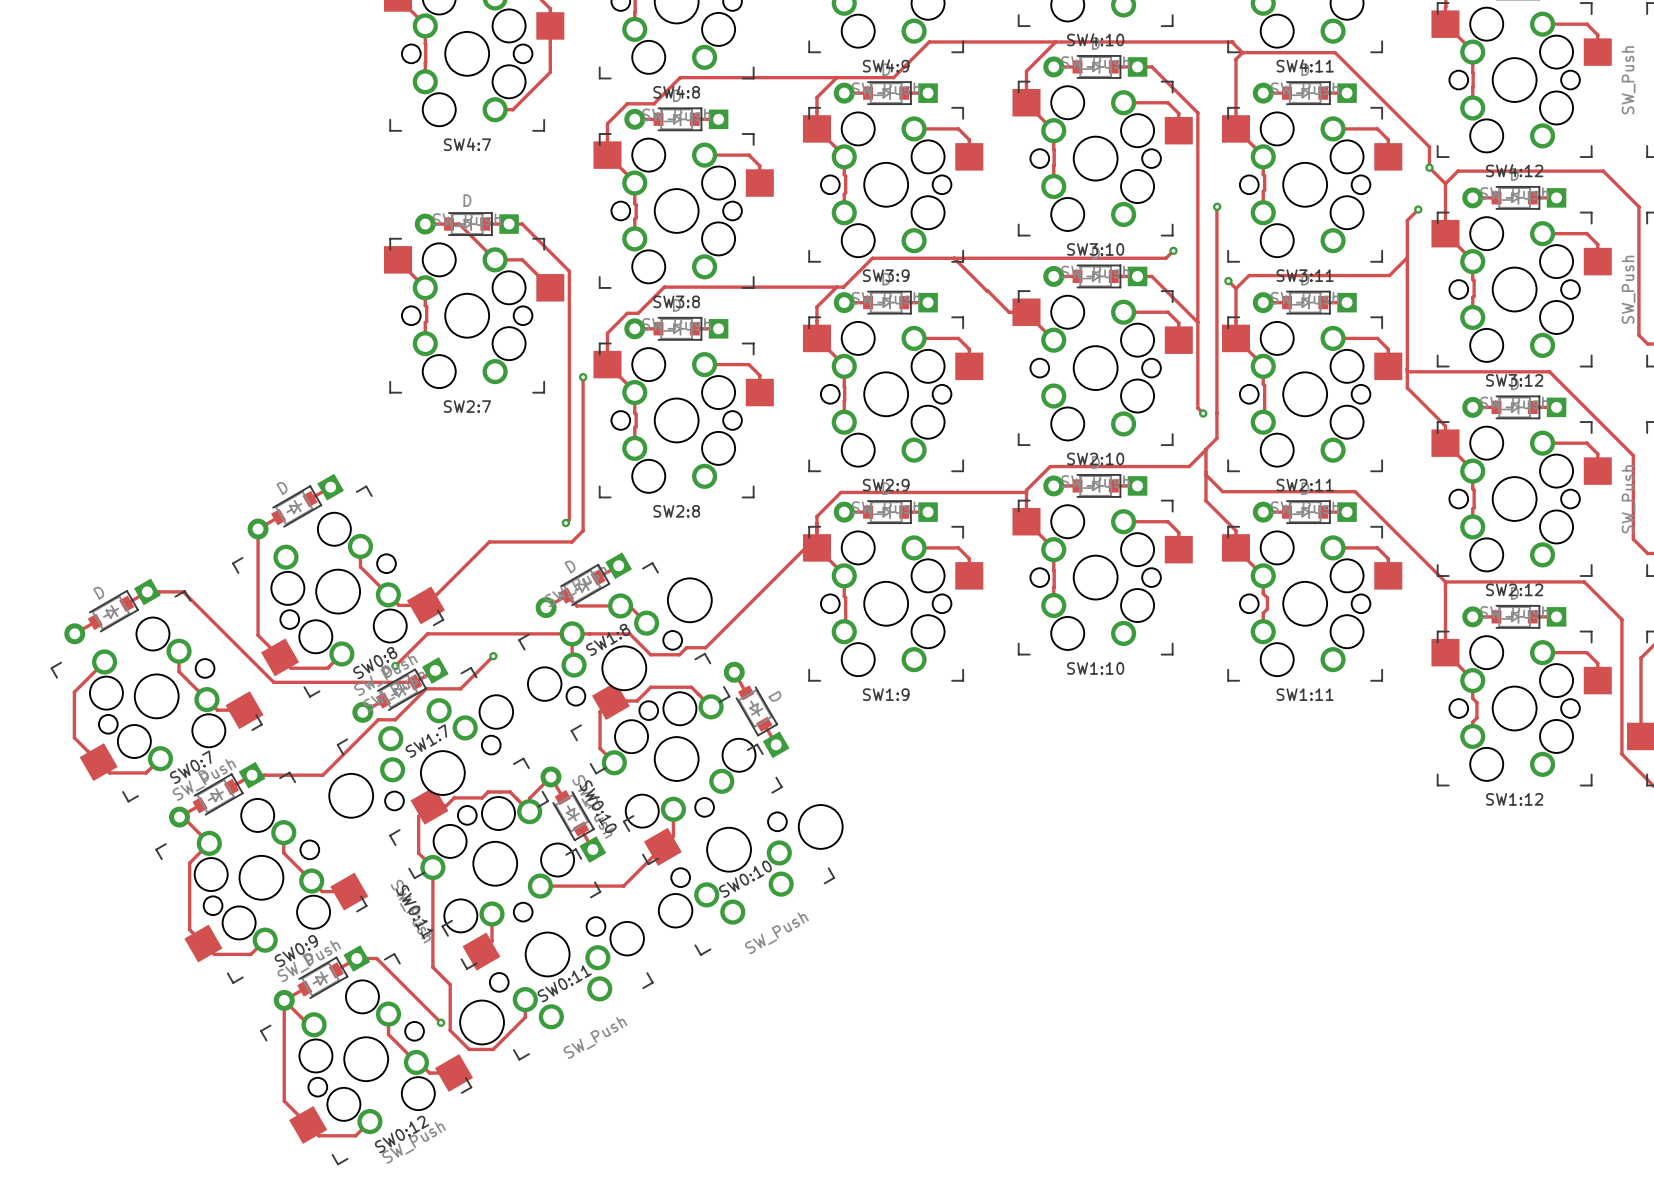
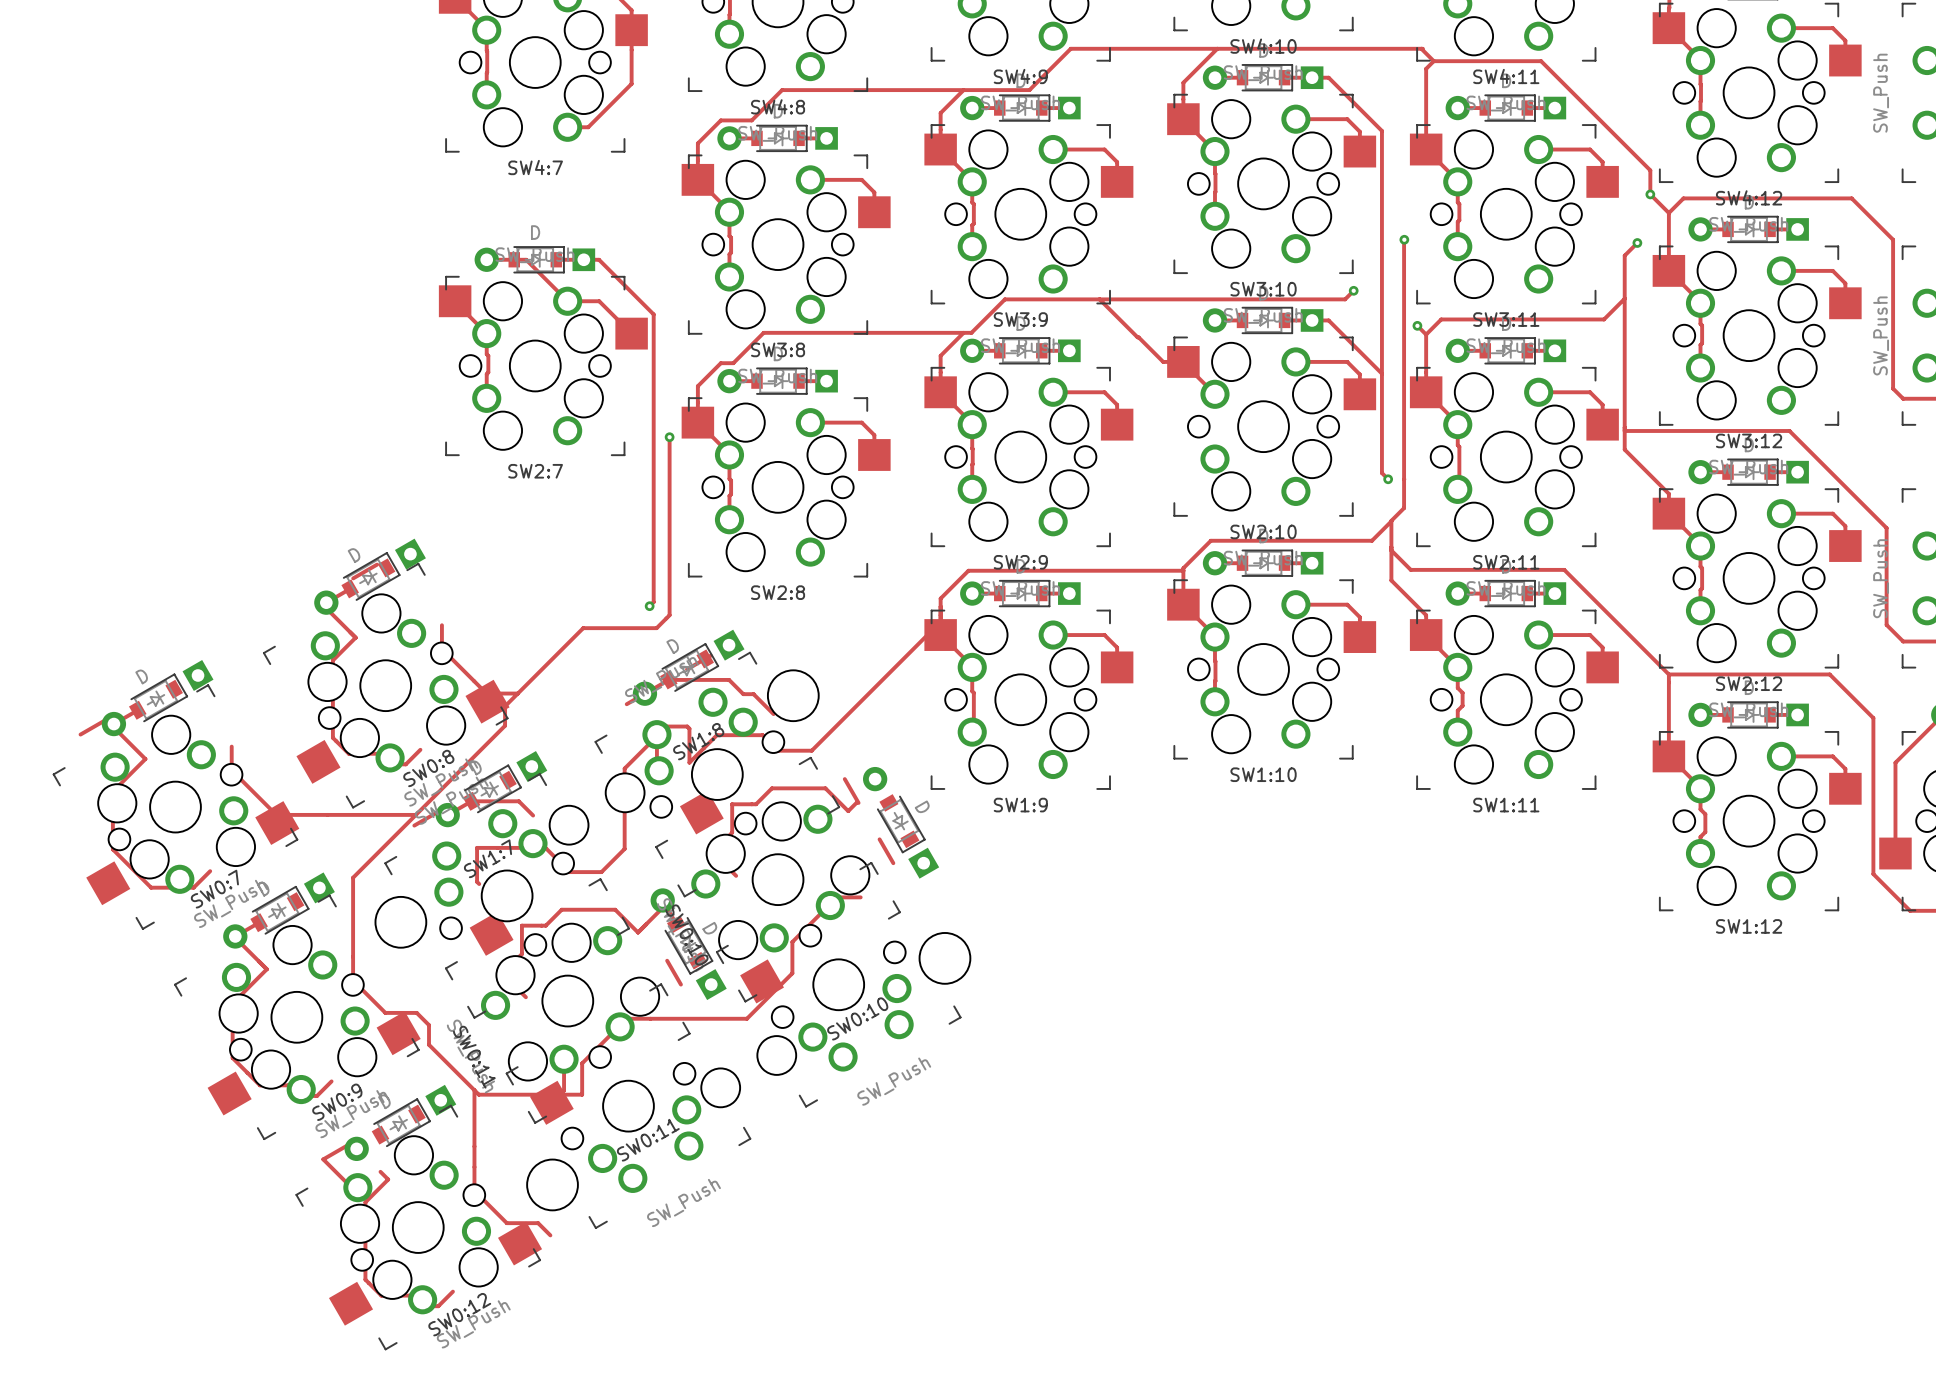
part position: (295, 506) -> (370, 576)
track: none -> (350, 588) (326, 602) (326, 608) (355, 637) (332, 660) (332, 737) (348, 753) (377, 753) (387, 764) (405, 764) (420, 749)
track: (278, 517) (258, 529) (258, 635) (290, 668) (327, 668) (341, 653) -> none
track: (508, 541) (489, 541) (425, 605) (398, 605) (360, 566) (360, 546) -> (583, 628) (505, 706) (505, 725) (353, 877) (353, 980) (385, 1012) (416, 1012) (429, 1025) (429, 1044) (478, 1094) (582, 1094) (582, 1063) (626, 1018) (746, 1018) (792, 973) (792, 941) (836, 897) (860, 897)
part position: (583, 585) -> (688, 667)
track: (566, 595) (576, 605) (629, 605) (646, 623) -> (650, 690) (668, 679) (729, 679) (743, 694) (753, 694) (773, 714)
track: (126, 603) (147, 591) (183, 591) (273, 682) (414, 682) (435, 670) -> none
part position: (112, 611) -> (157, 698)
track: none -> (137, 710) (113, 724) (113, 727) (145, 759) (112, 791) (112, 849) (151, 887) (193, 887) (210, 871)
track: none -> (231, 746) (231, 770) (276, 814) (415, 814)
track: (686, 647) (679, 654) (650, 654) (629, 633) (427, 633) (395, 665) -> (789, 750) (778, 750) (762, 735) (716, 735) (689, 762) (689, 728) (687, 726) (666, 726) (624, 768) (624, 848) (601, 872) (569, 872) (545, 847) (477, 847) (477, 881) (479, 884)
track: (179, 651) (179, 671) (217, 710) (244, 710) -> (441, 625) (441, 648) (486, 693) (517, 693)
track: (493, 656) (460, 688) (426, 688) (395, 719) (378, 719) (322, 775) (252, 775) (231, 787) -> none
via: (493, 656) -> none
track: (104, 661) (74, 692) (74, 737) (109, 772) (146, 772) (160, 758) -> none
via: (395, 665) -> none
part position: (400, 689) -> (491, 789)
track: none -> (856, 802) (848, 811) (825, 788) (771, 788) (756, 804) (732, 804) (732, 832) (721, 843) (721, 861) (736, 875)
track: none -> (447, 815) (471, 801) (518, 801) (533, 815)
track: (711, 706) (691, 687) (650, 687) (637, 700) (610, 700) (600, 711) (600, 748) (614, 762) -> none
part position: (756, 709) -> (901, 822)
part position: (217, 794) -> (279, 910)
track: none -> (259, 922) (235, 936) (266, 969) (232, 1003) (232, 1058) (259, 1085) (288, 1085) (298, 1095) (317, 1095) (331, 1081)
track: (562, 797) (550, 776) (529, 798) (529, 811) (510, 791) (488, 791) (482, 797) (454, 797) (446, 805) (429, 805) (418, 816) (418, 853) (432, 867) (432, 967) (450, 984) (450, 1030) (469, 1049) (493, 1049) (525, 1017) (525, 999) -> none
track: none -> (676, 924) (662, 900) (662, 907) (638, 932) (615, 909) (561, 909) (545, 925) (521, 925) (521, 954) (511, 964) (511, 982) (525, 997)
track: (200, 805) (179, 817) (183, 817) (209, 843) (189, 863) (189, 929) (214, 954) (250, 954) (265, 940) -> none
track: (673, 809) (673, 836) (623, 886) (540, 886) -> none
part position: (573, 814) -> (688, 944)
track: (283, 832) (283, 853) (322, 891) (349, 891) -> none
track: none -> (474, 1090) (474, 1190) (506, 1223) (538, 1223) (550, 1235)
track: (336, 970) (356, 958) (376, 958) (440, 1022) -> none
part position: (321, 978) -> (400, 1122)
track: (284, 1000) (284, 1101) (319, 1135) (355, 1135) (369, 1121) -> none
track: none -> (380, 1171) (388, 1179) (365, 1202) (365, 1279) (381, 1295) (409, 1295) (420, 1306) (438, 1306) (452, 1291)
track: (388, 1014) (388, 1034) (416, 1062) (419, 1062) (429, 1073) (454, 1073) -> none
via: (440, 1022) -> none

